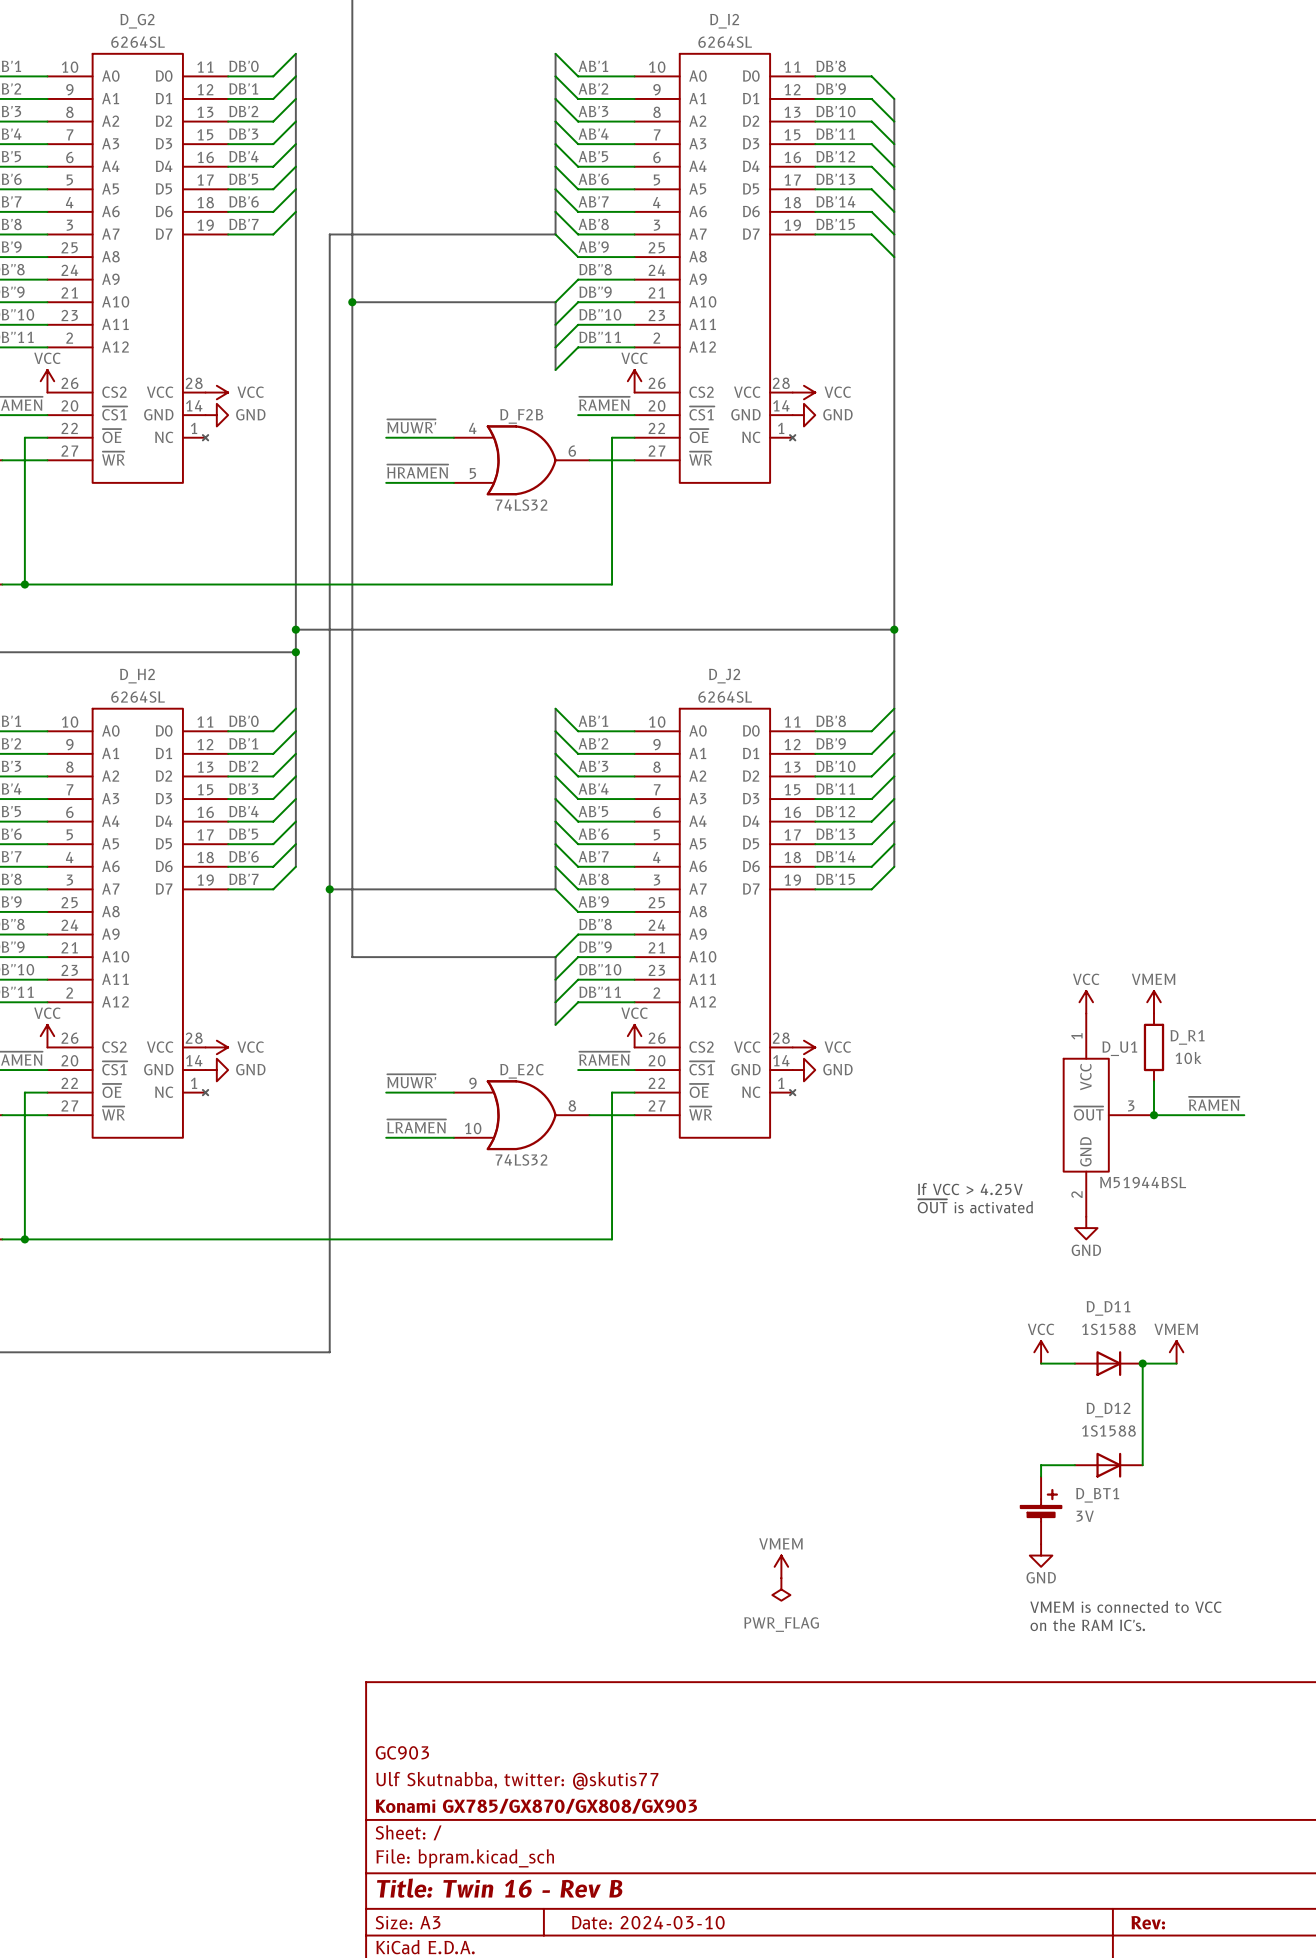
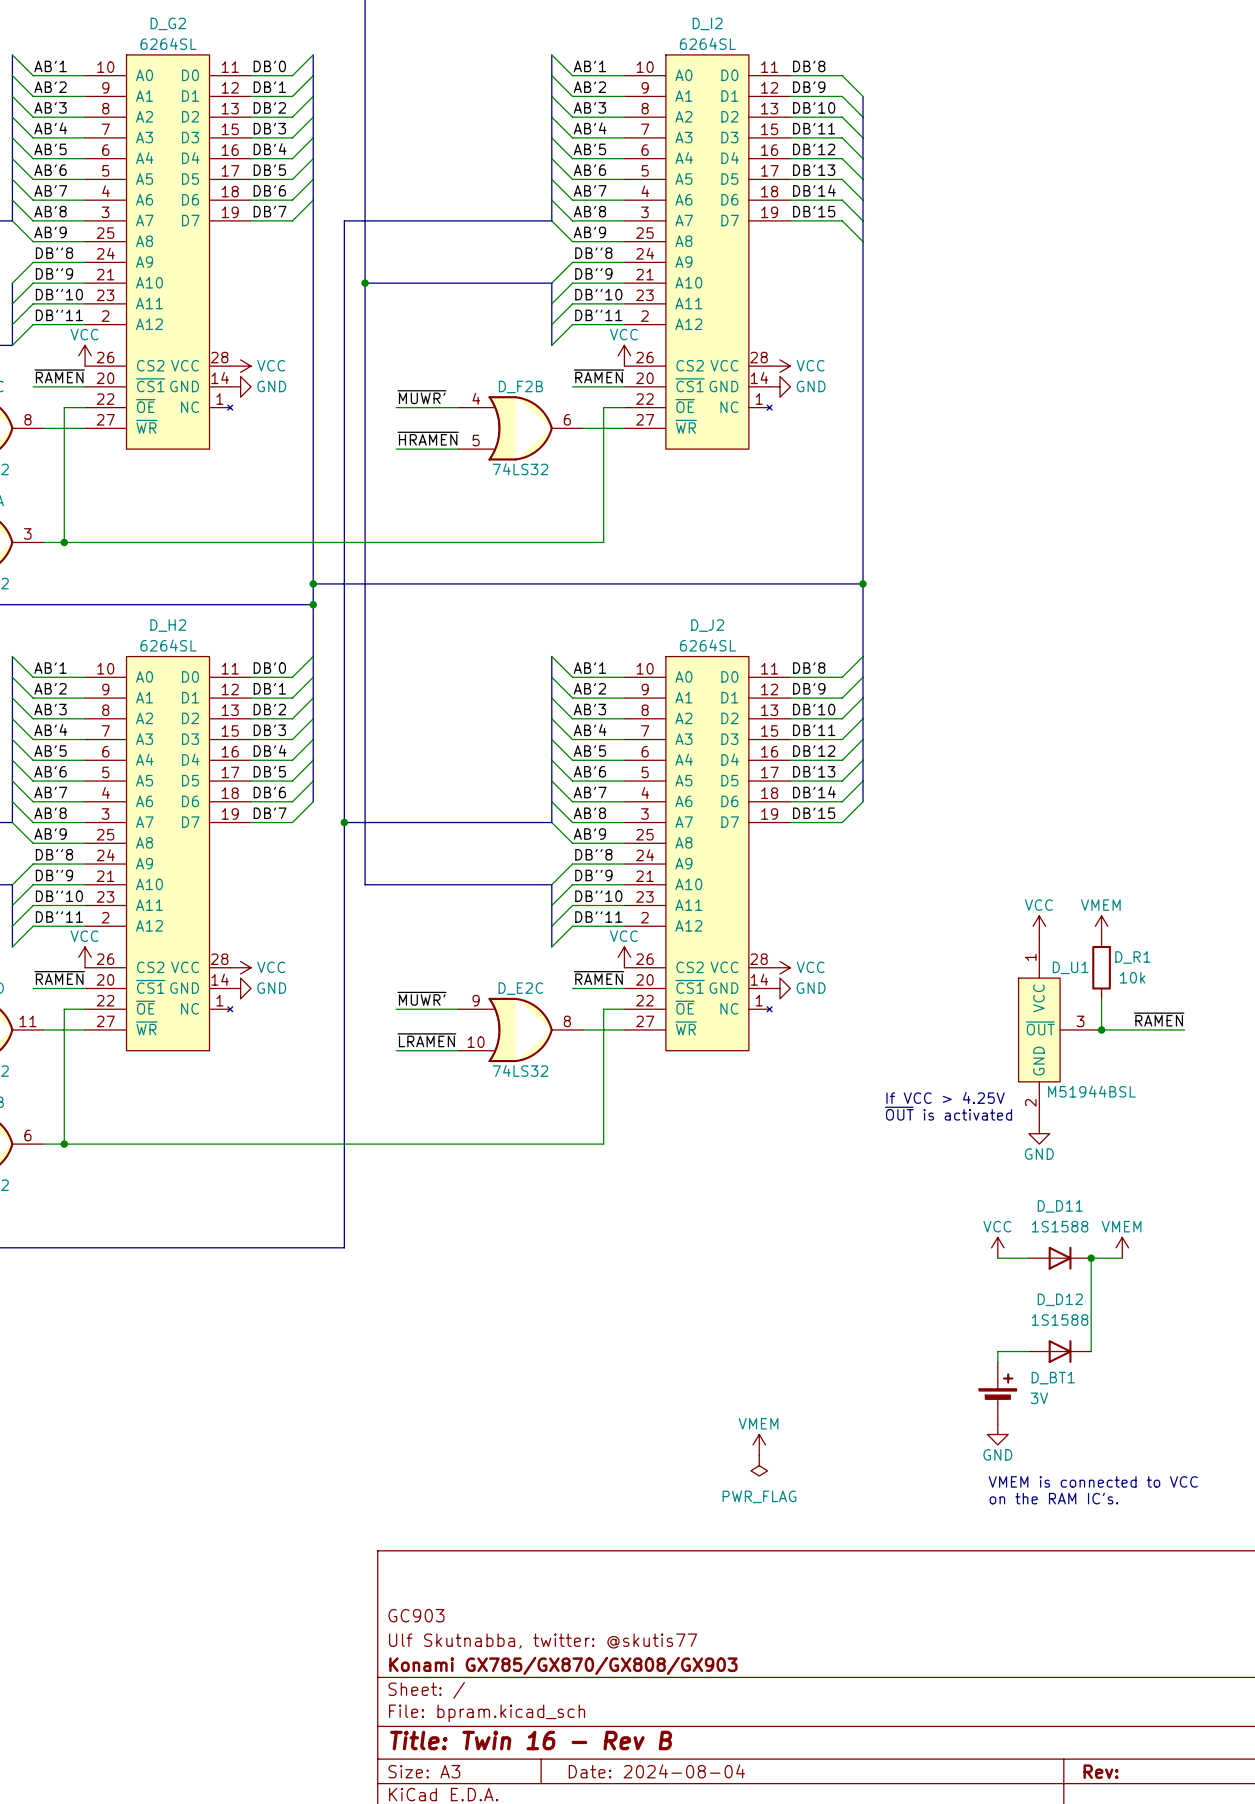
title block: Date: 2024-03-10 (648, 1922) -> Date: 2024-08-04 (656, 1771)

